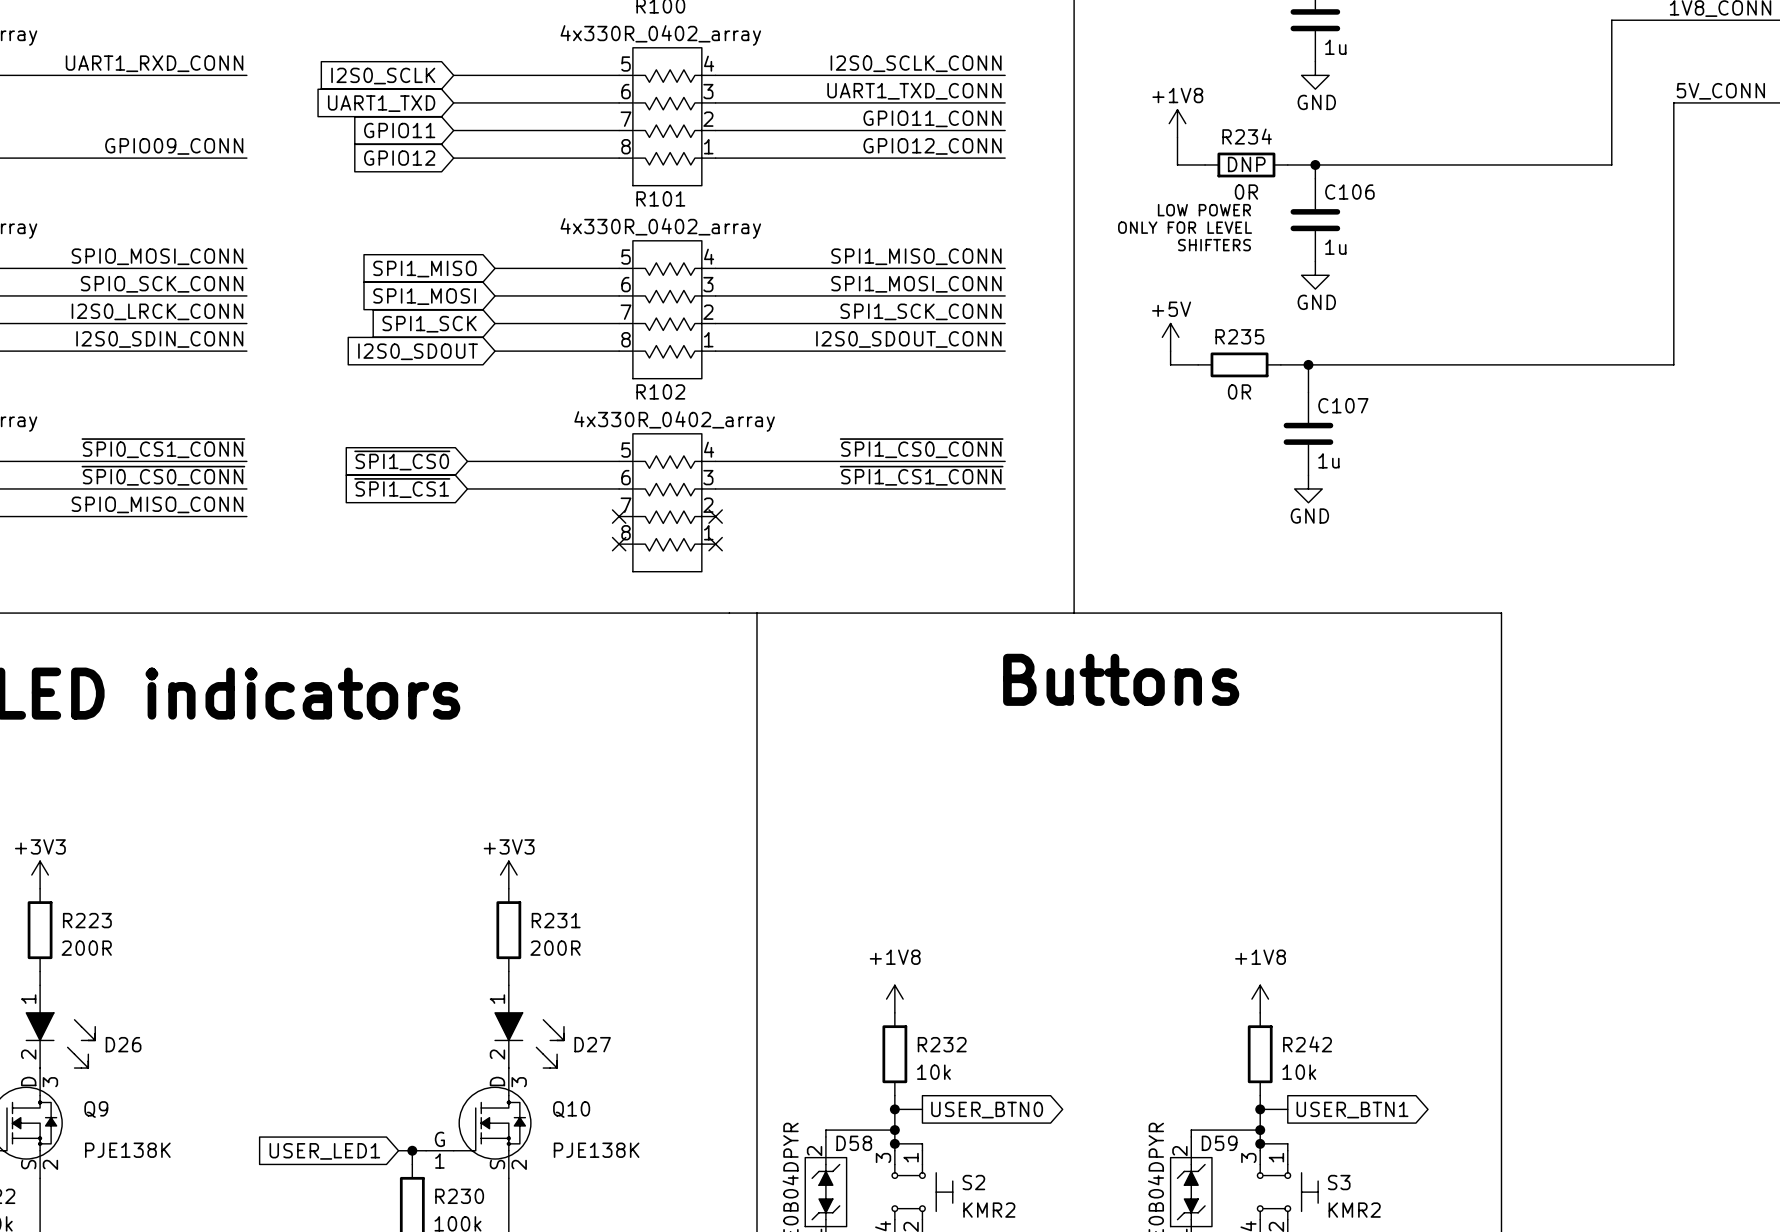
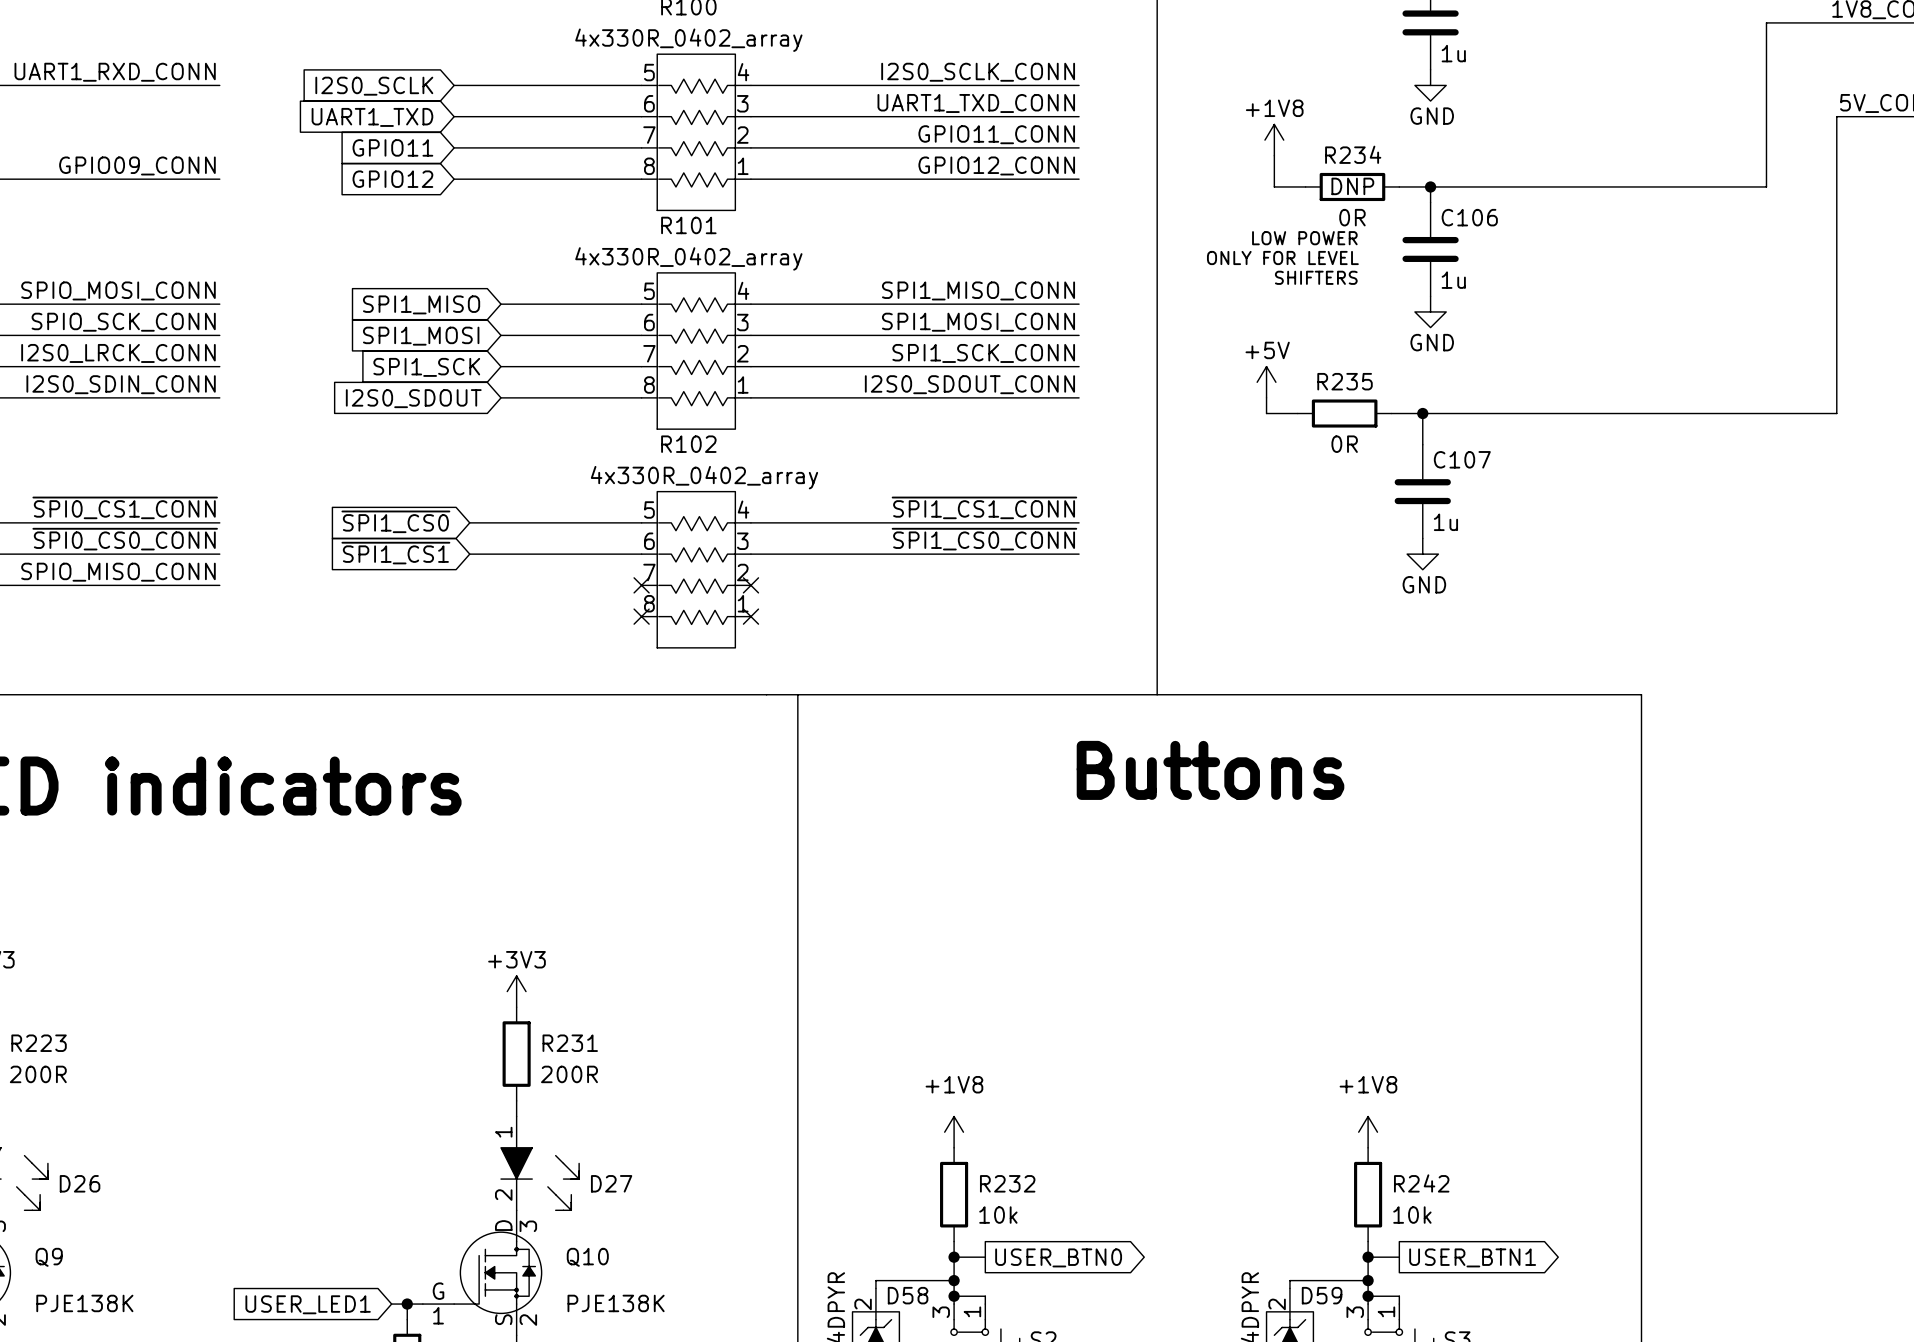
label: ~{SPI1_CS0_CONN} (921, 448) -> ~{SPI1_CS1_CONN} (984, 507)
label: ~{SPI1_CS1_CONN} (921, 475) -> ~{SPI1_CS0_CONN} (984, 539)

